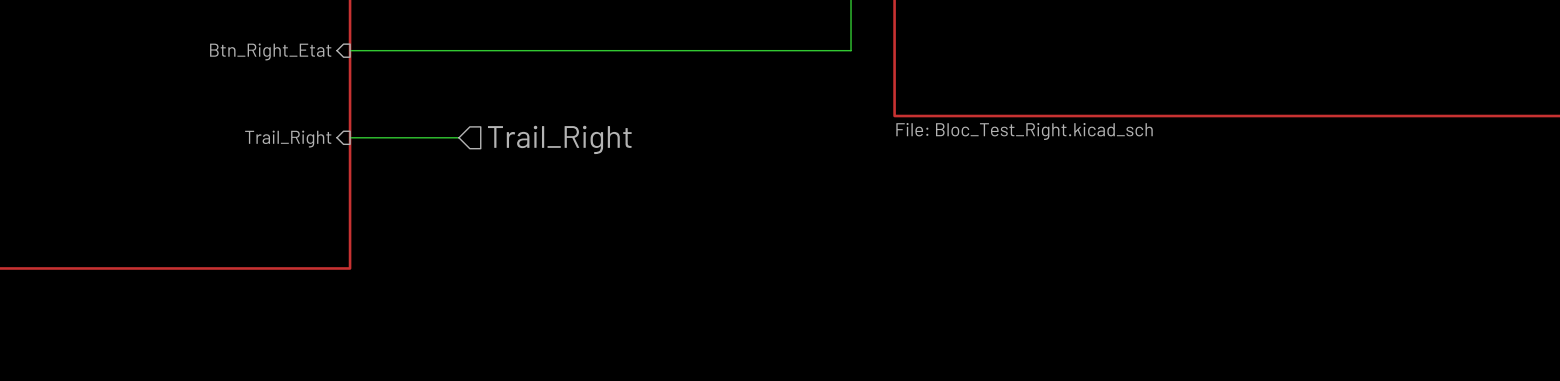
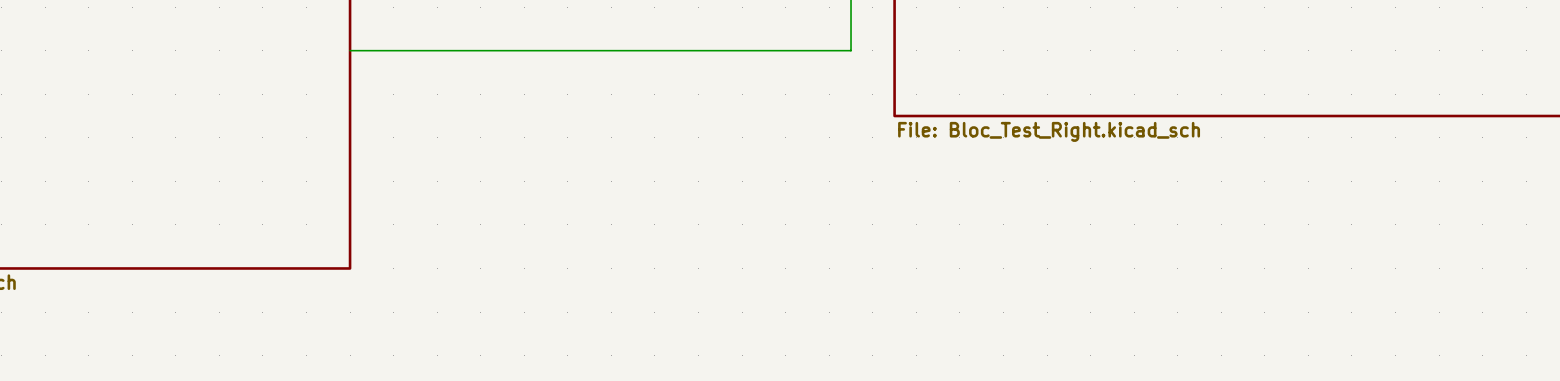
sheet pin: Btn_Right_Etat (270, 51) -> none
wire: (350, 137) (458, 137) -> none
sheet pin: Trail_Right (288, 139) -> none
hierarchical label: Trail_Right (559, 139) -> none

